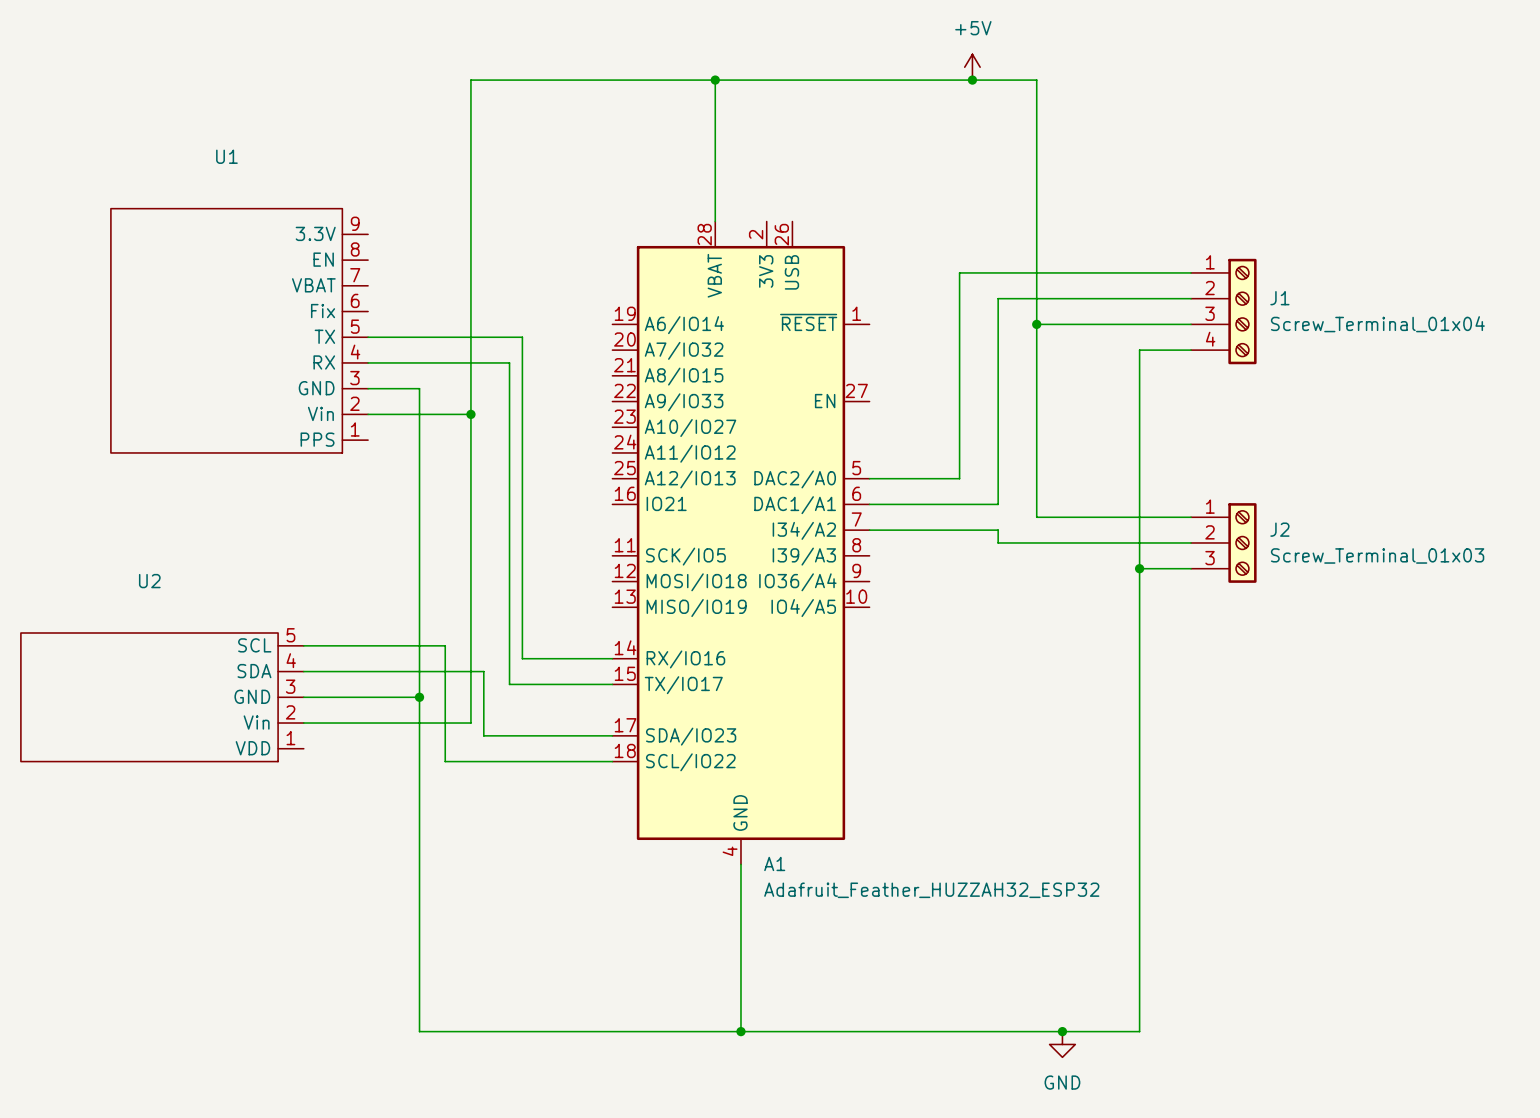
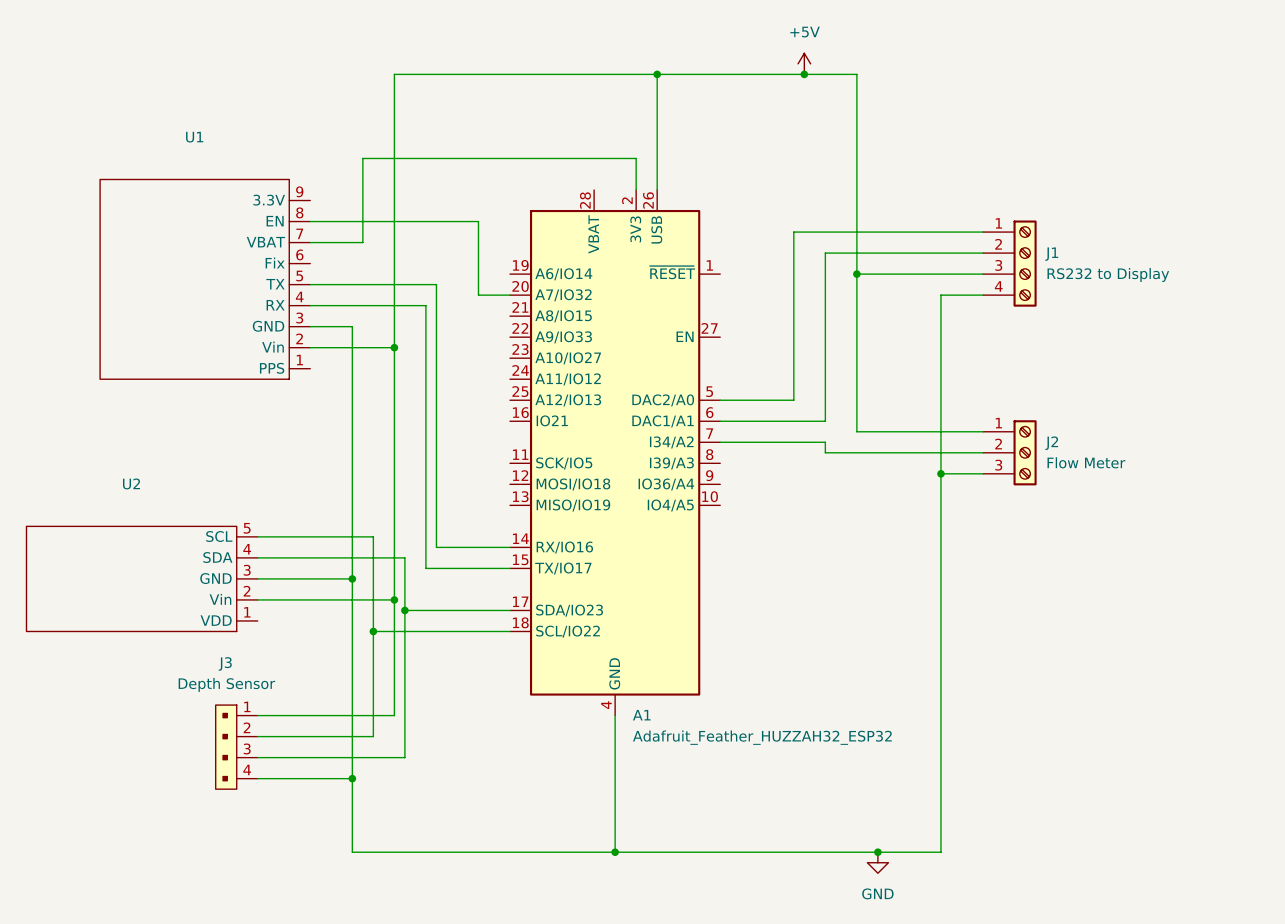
wire: (715, 80) (715, 221) -> (657, 74) (657, 190)
junction: (715, 80) -> none
junction: none -> (657, 74)
wire: none -> (636, 190) (636, 158) (362, 158) (362, 242) (310, 242)
wire: none -> (310, 221) (478, 221) (478, 295) (510, 295)
J1 value: Screw_Terminal_01x04 (1377, 324) -> RS232 to Display (1108, 274)
J2 value: Screw_Terminal_01x03 (1377, 555) -> Flow Meter (1086, 462)
wire: none -> (394, 599) (394, 715) (257, 715)
junction: none -> (394, 599)
wire: none -> (404, 610) (404, 757) (257, 757)
junction: none -> (404, 610)
wire: none -> (373, 631) (373, 736) (257, 736)
junction: none -> (373, 631)
J3: none -> Depth Sensor (236, 747)
wire: none -> (257, 778) (352, 778)
junction: none -> (352, 778)

